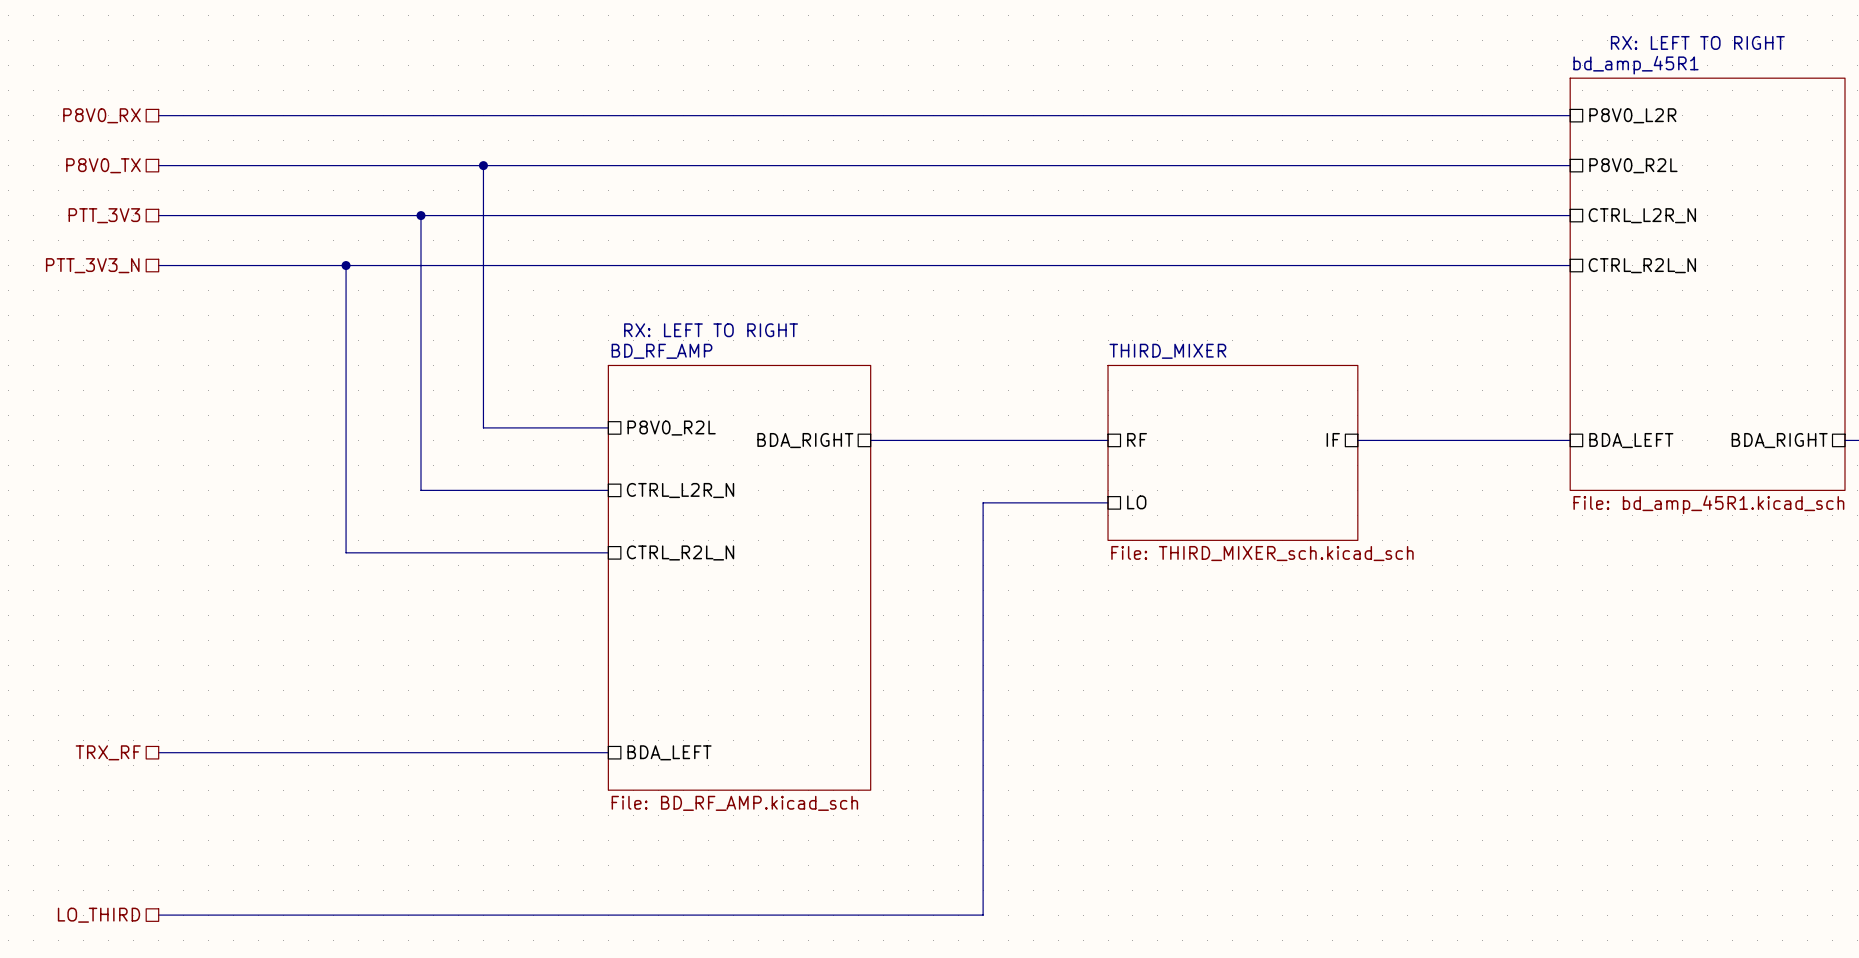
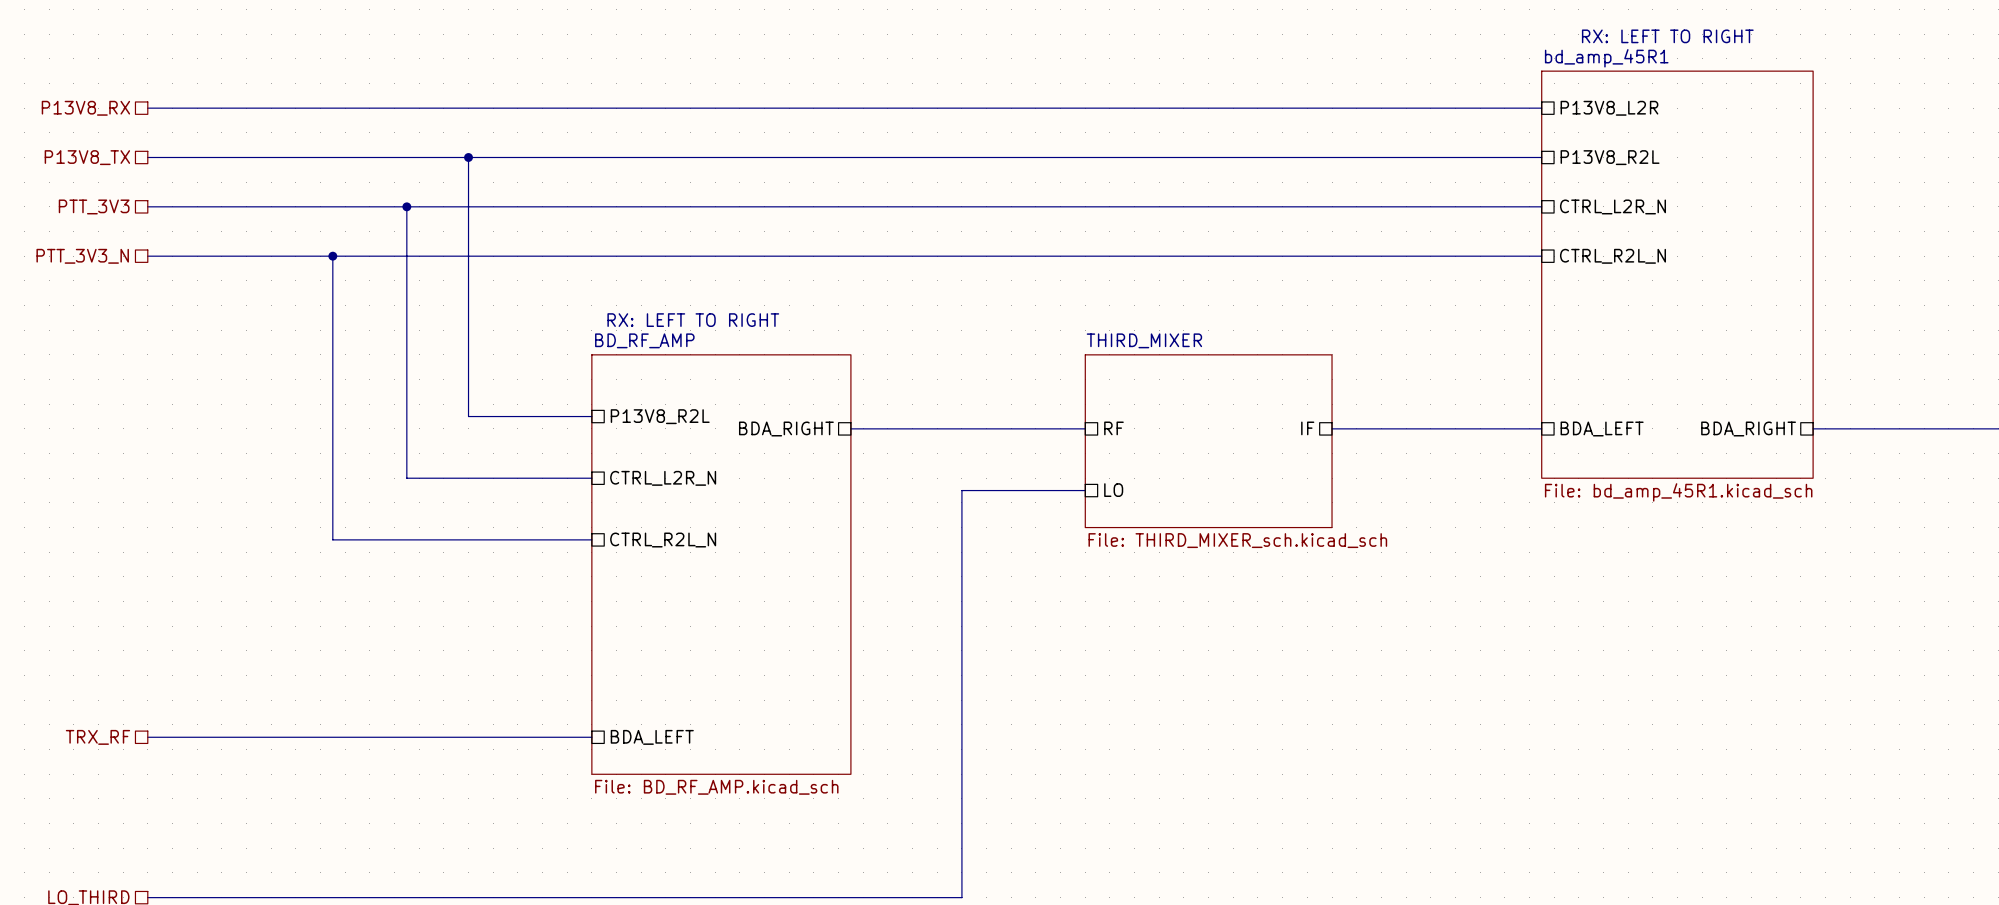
hierarchical label: P8V0_RX (101, 115) -> P13V8_RX (85, 108)
sheet pin: P8V0_L2R (1632, 115) -> P13V8_L2R (1609, 108)
hierarchical label: P8V0_TX (103, 165) -> P13V8_TX (87, 157)
sheet pin: P8V0_R2L (1633, 165) -> P13V8_R2L (1610, 157)
sheet pin: P8V0_R2L (671, 428) -> P13V8_R2L (660, 416)

